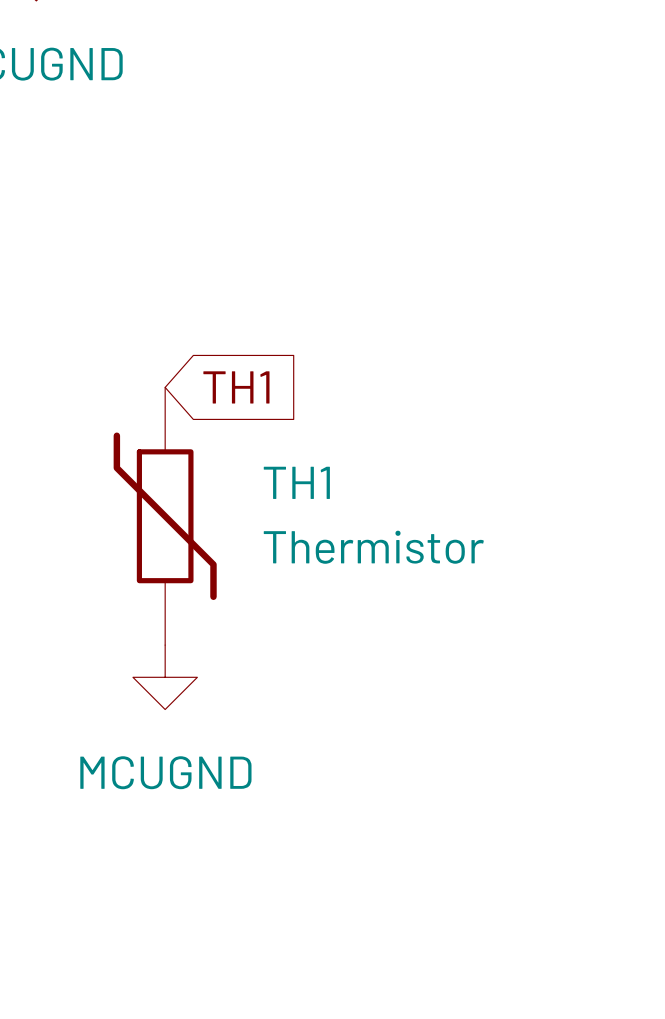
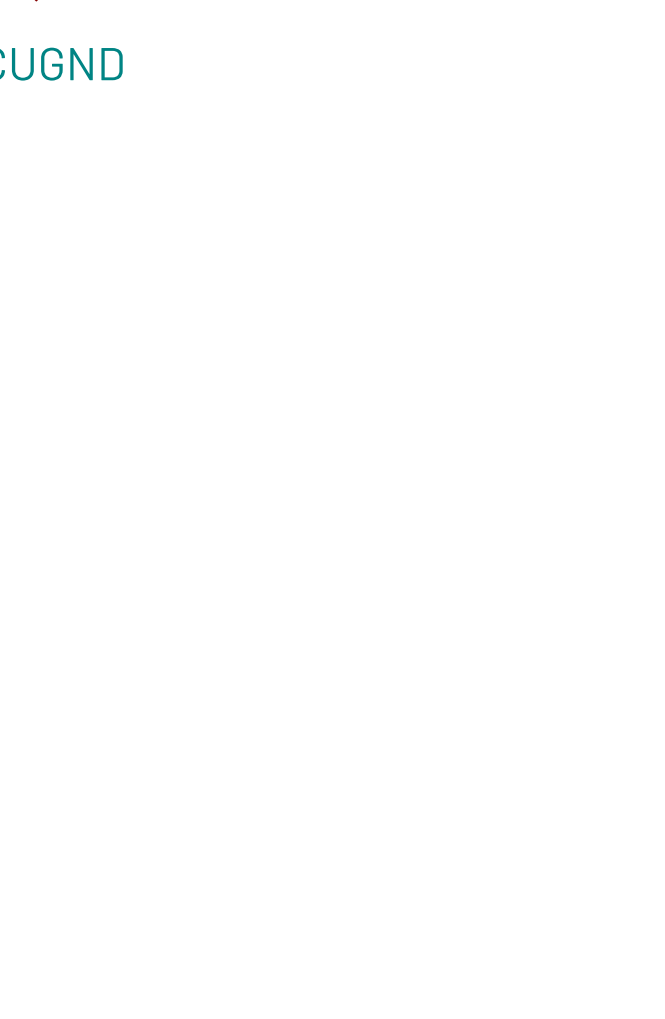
global label: TH1 (236, 387) -> none
TH1: Thermistor (165, 516) -> none
power symbol: MCUGND (165, 677) -> none

